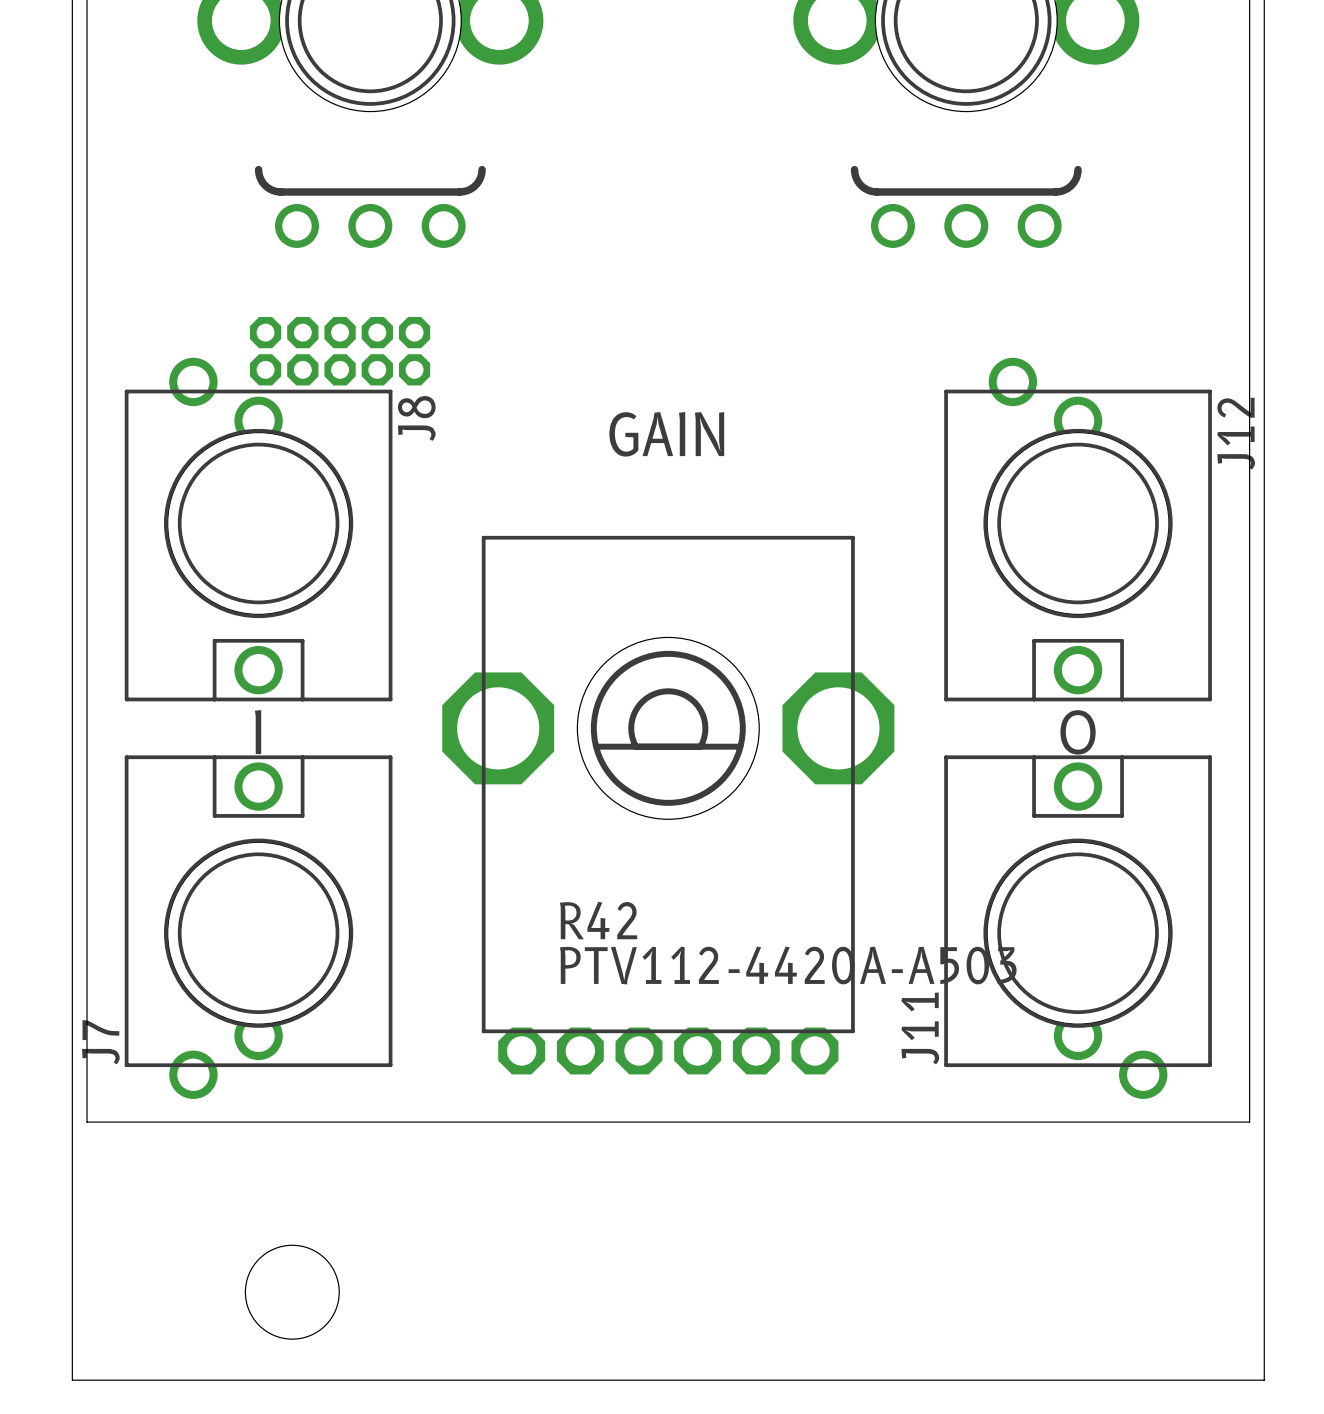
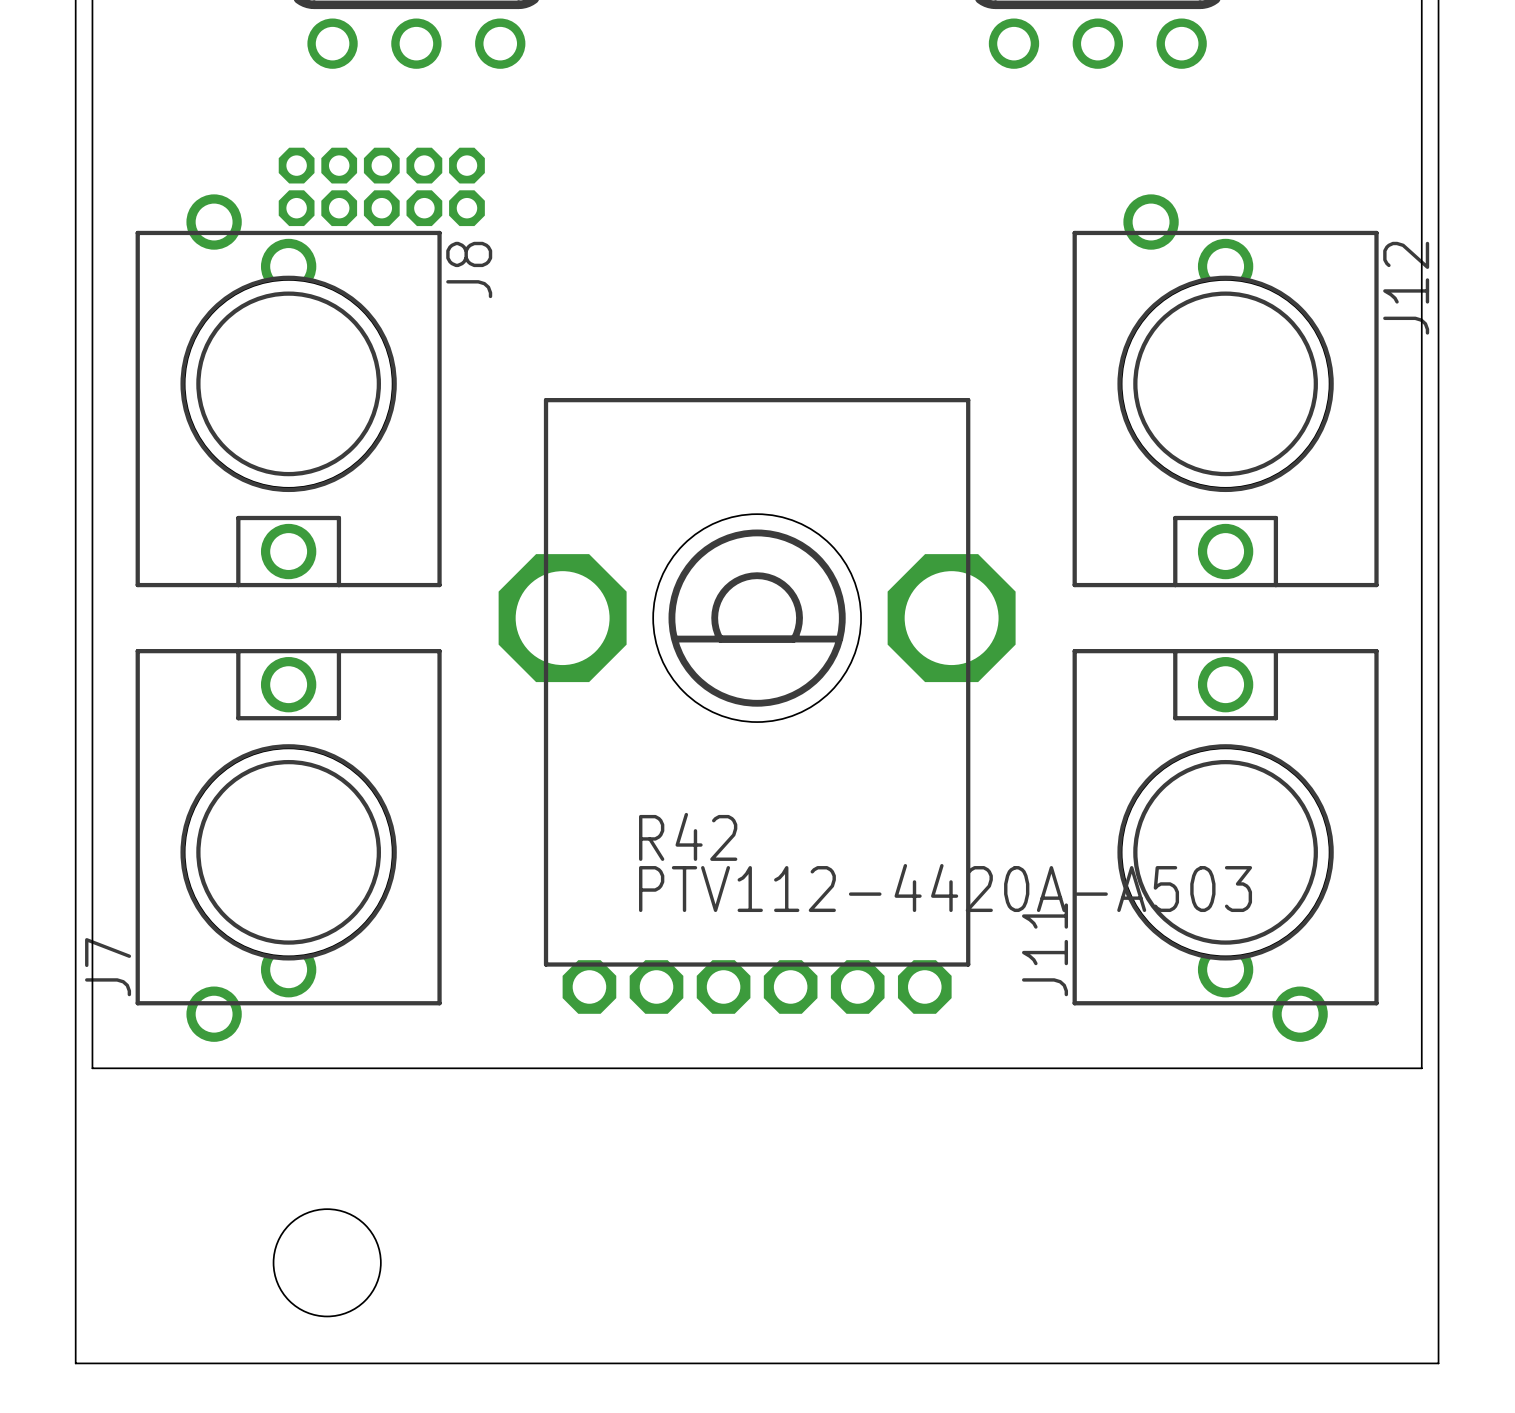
text: GAIN (666, 434) -> none
text: I (258, 732) -> none
text: O (1078, 732) -> none

